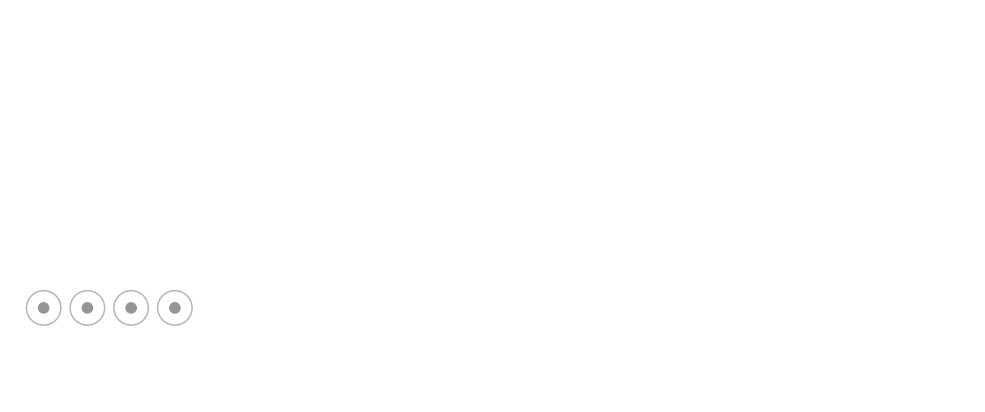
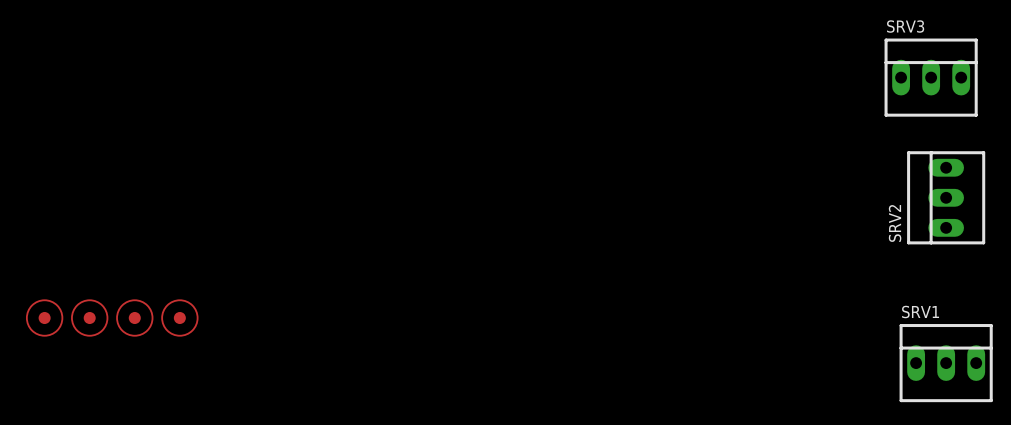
SRV3: none -> (931, 77)
SRV2: none -> (946, 197)
SRV1: none -> (946, 363)

